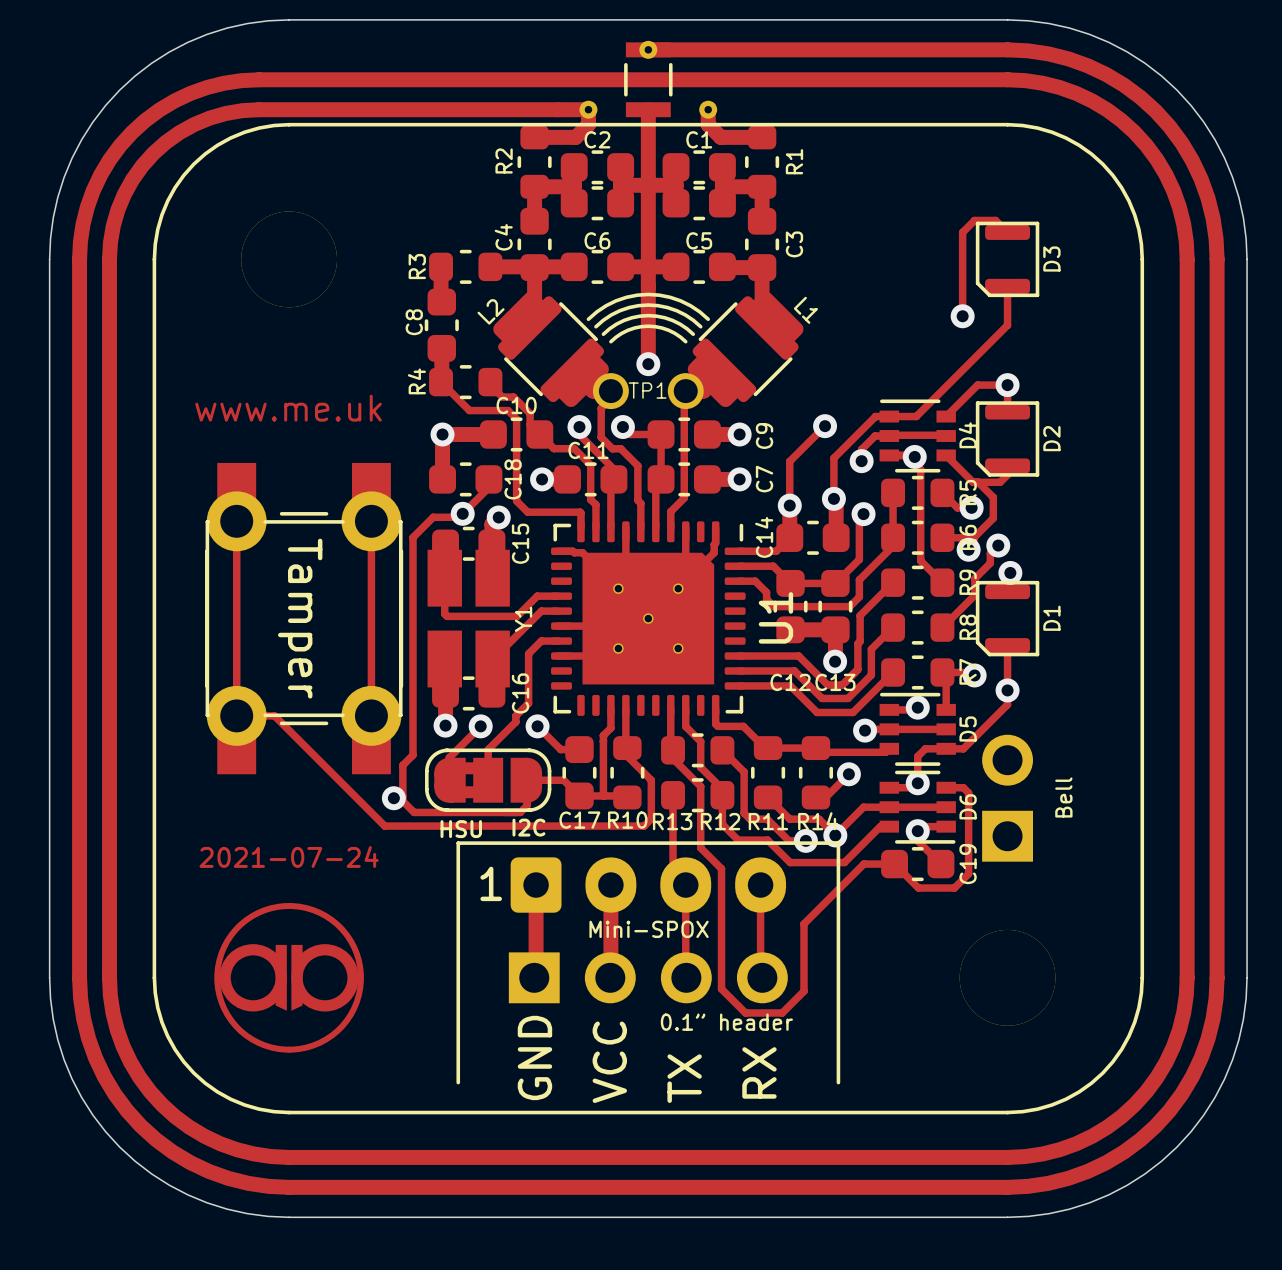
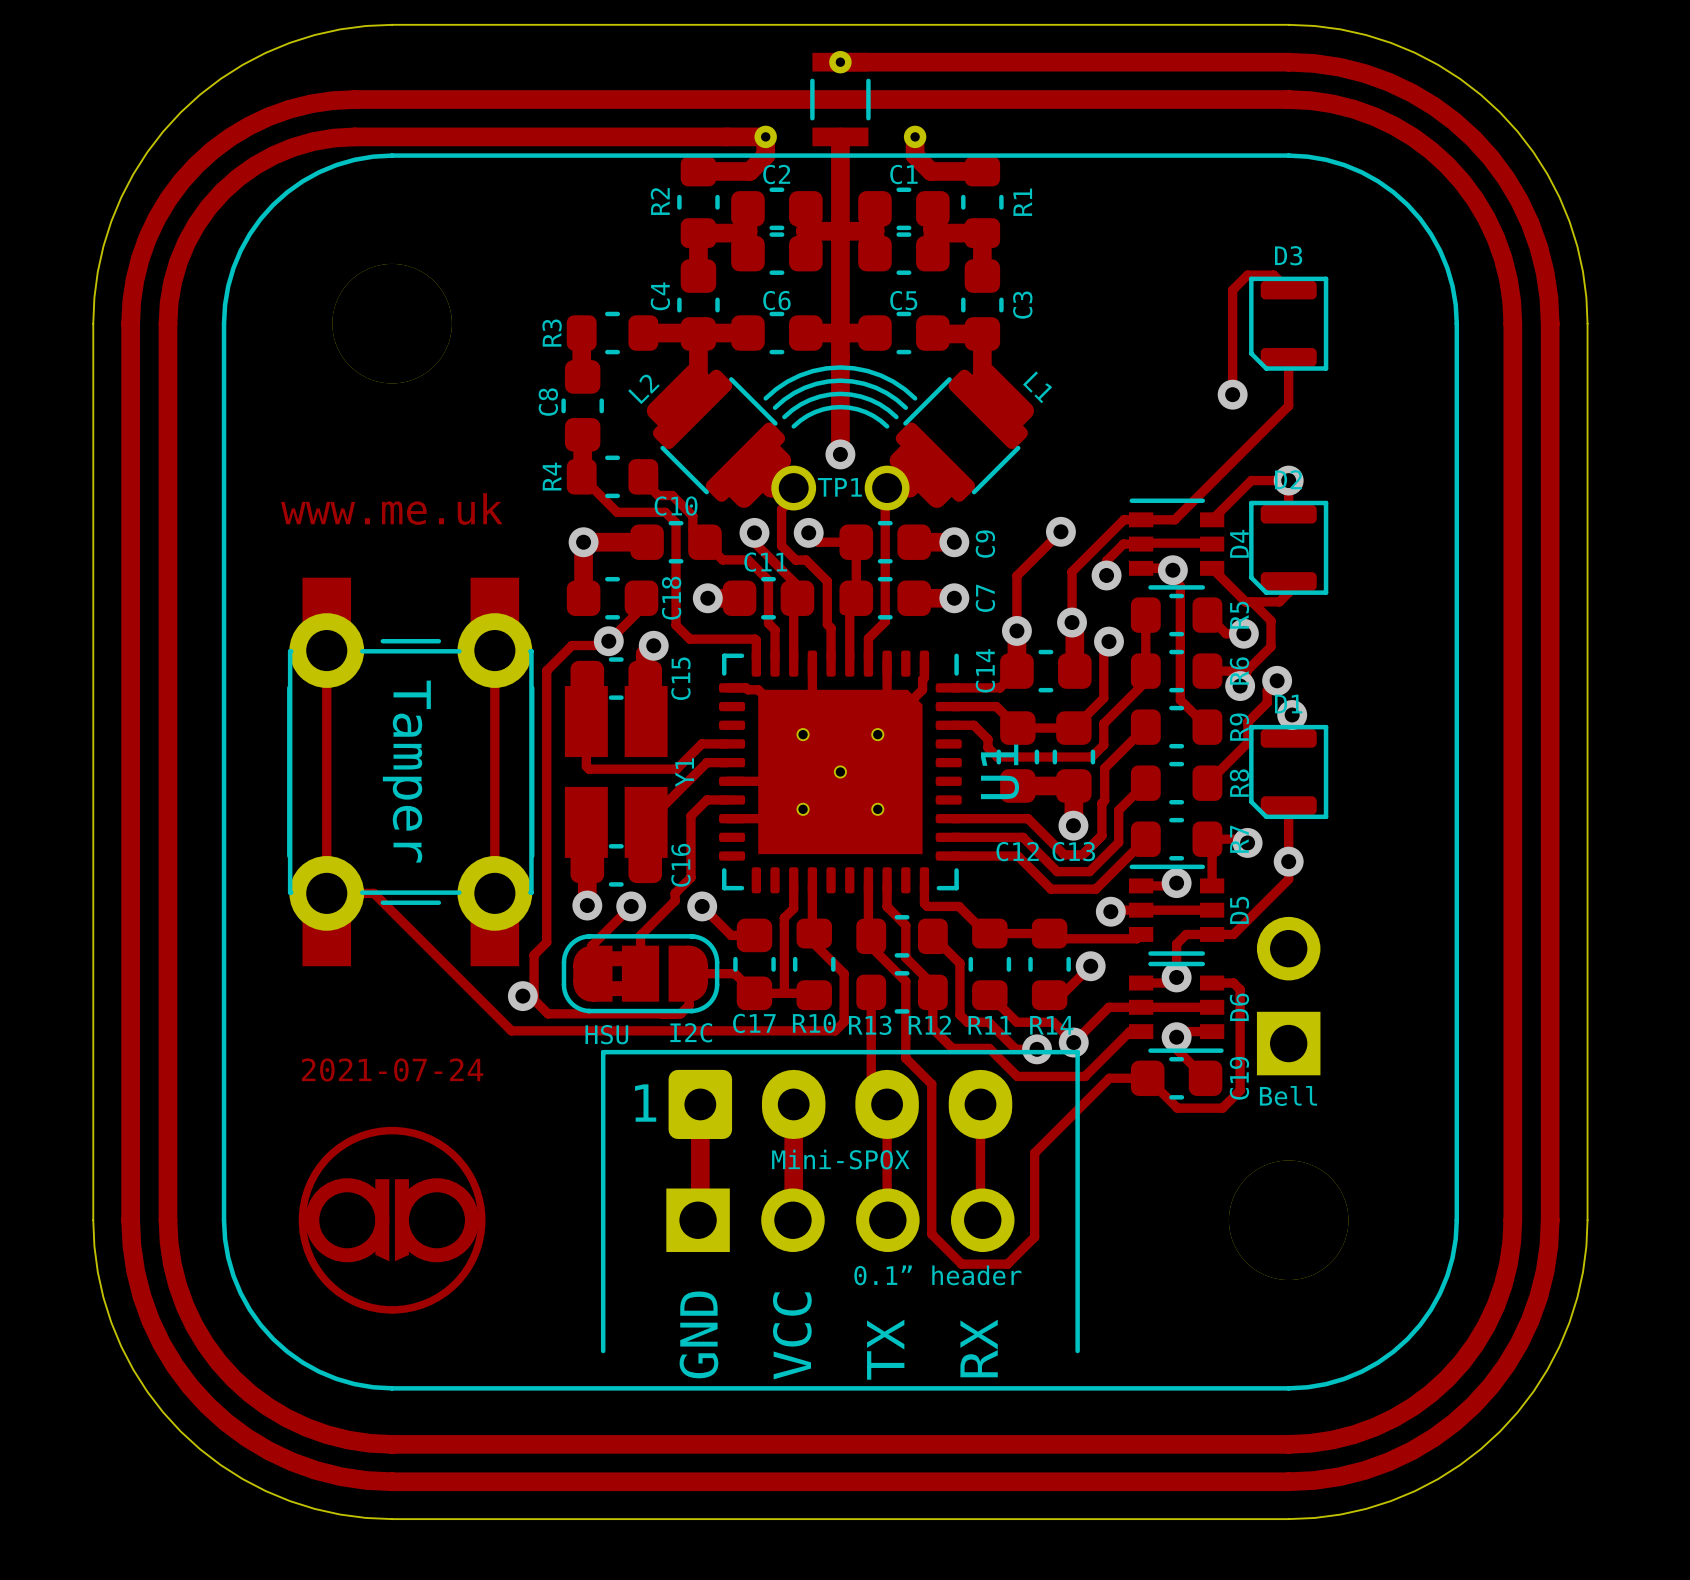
D3 name rotation: 0° (1051, 259) -> 90° clockwise (1288, 255)
D3 name position: D3 (1051, 259) -> D3 (1288, 255)
D2 name rotation: 0° (1051, 438) -> 90° clockwise (1288, 479)
D2 name position: D2 (1051, 438) -> D2 (1288, 479)
D1 name rotation: 0° (1051, 618) -> 90° clockwise (1288, 704)
D1 name position: D1 (1051, 618) -> D1 (1288, 704)
text rotation: 0° (1063, 797) -> 90° clockwise (1288, 1095)
text position: Bell (1063, 797) -> Bell (1288, 1095)

